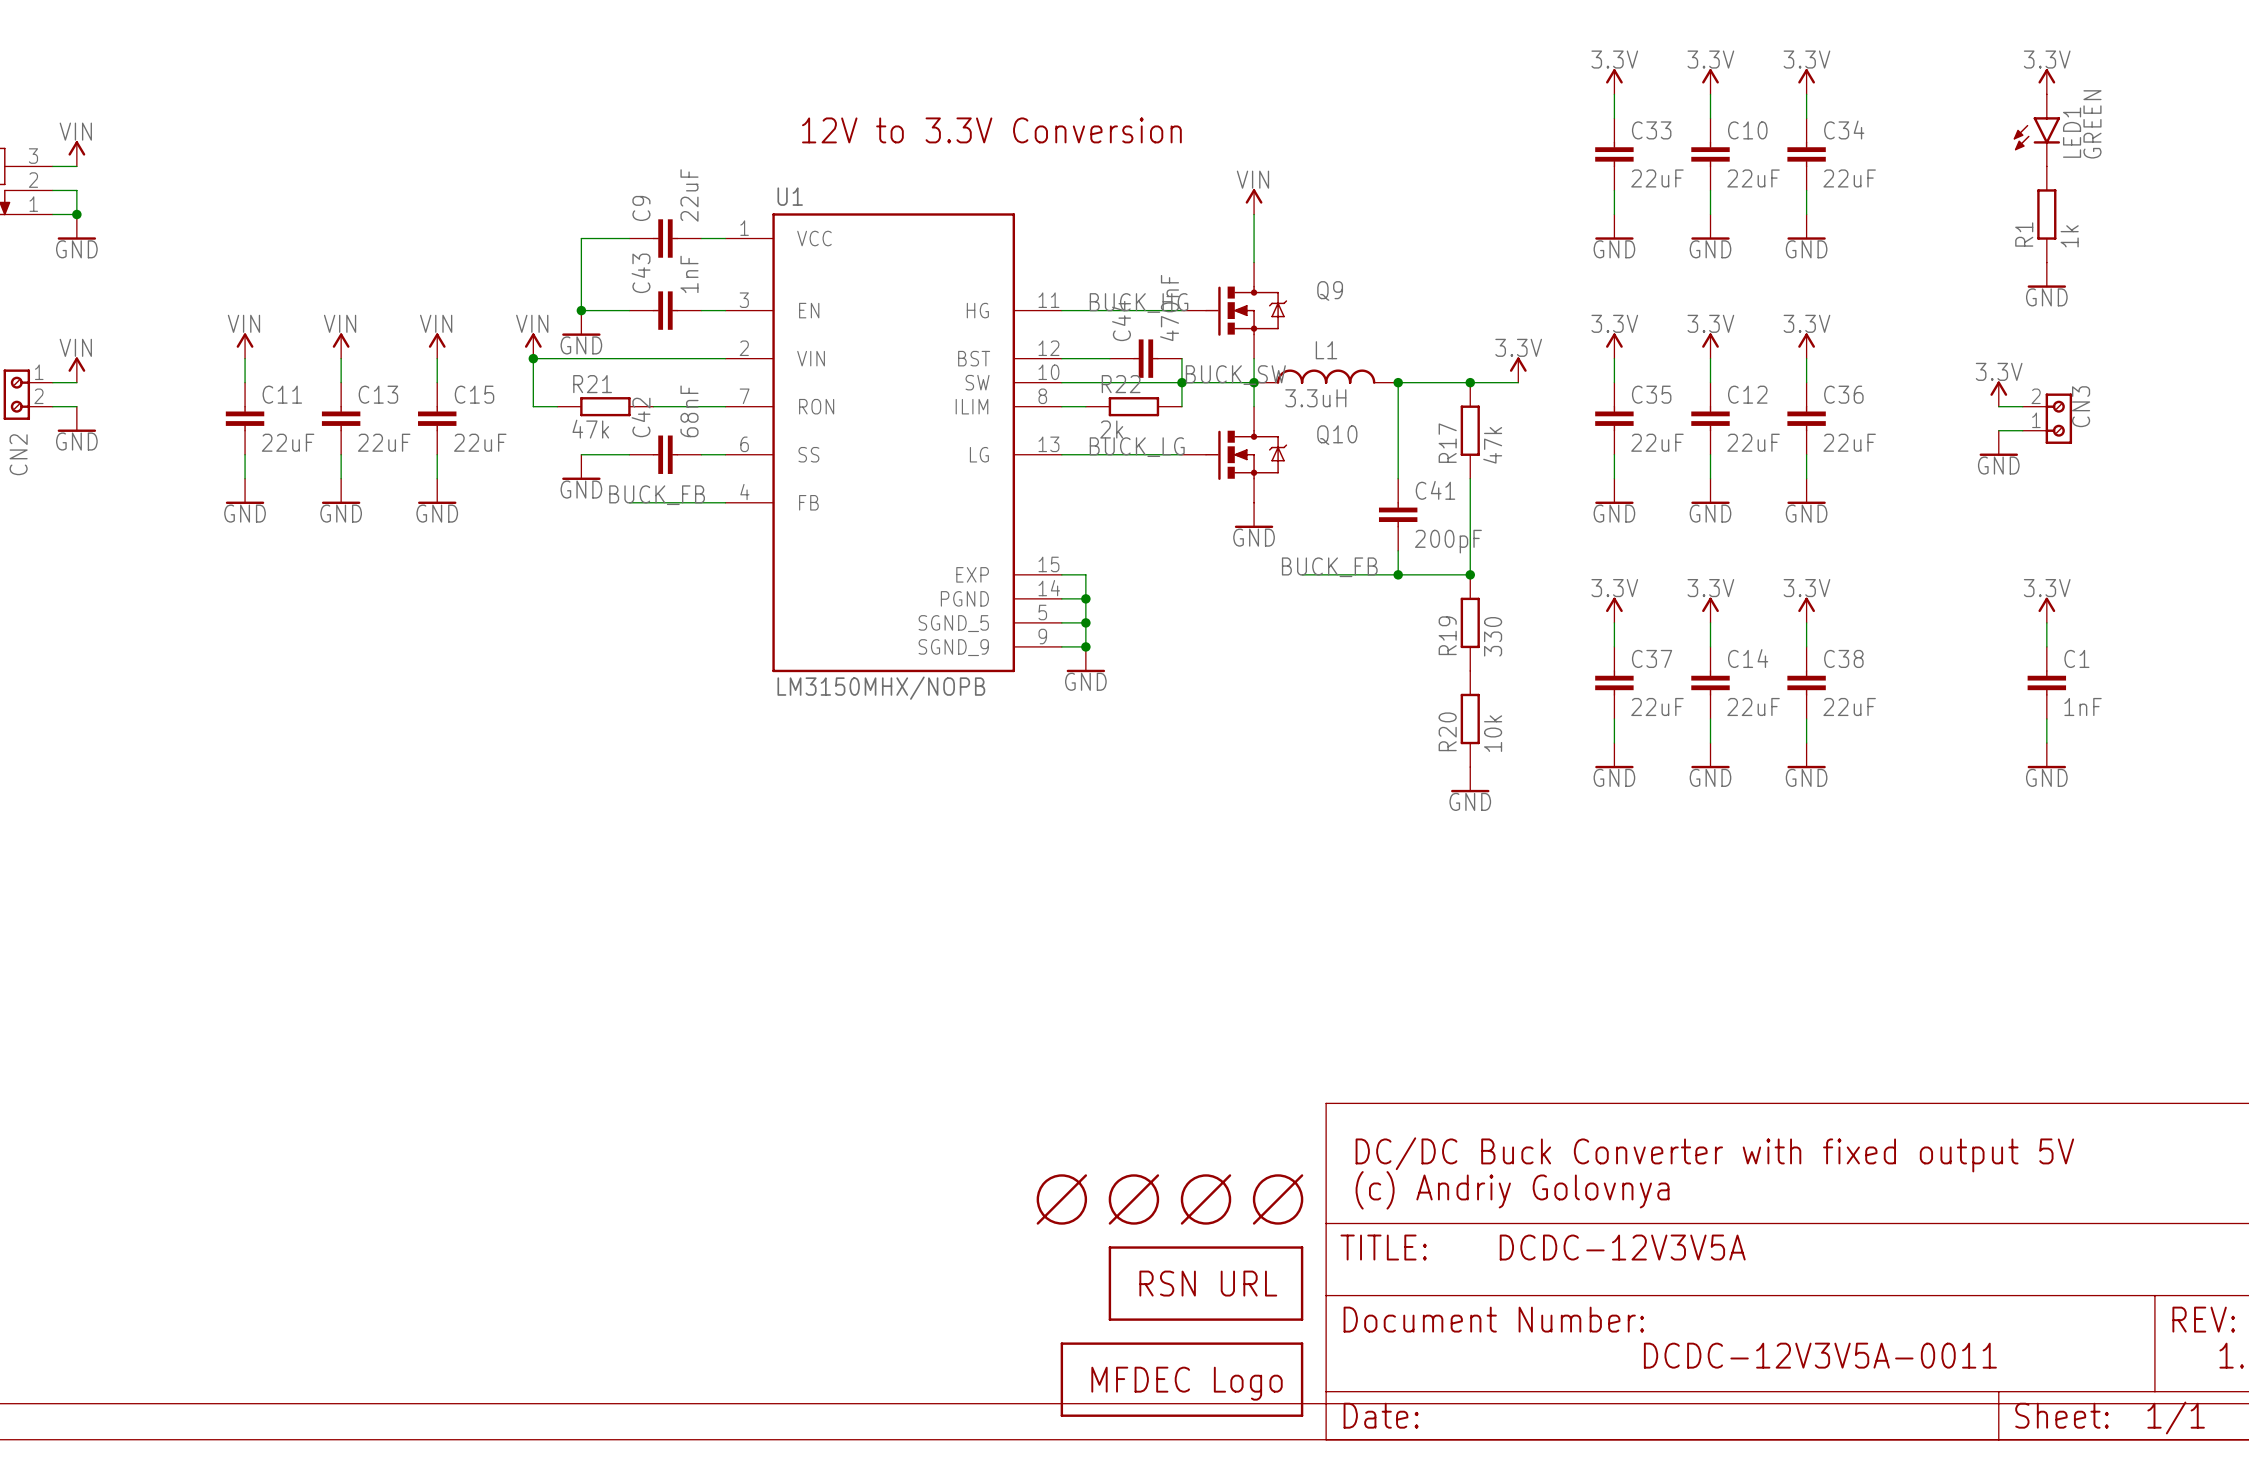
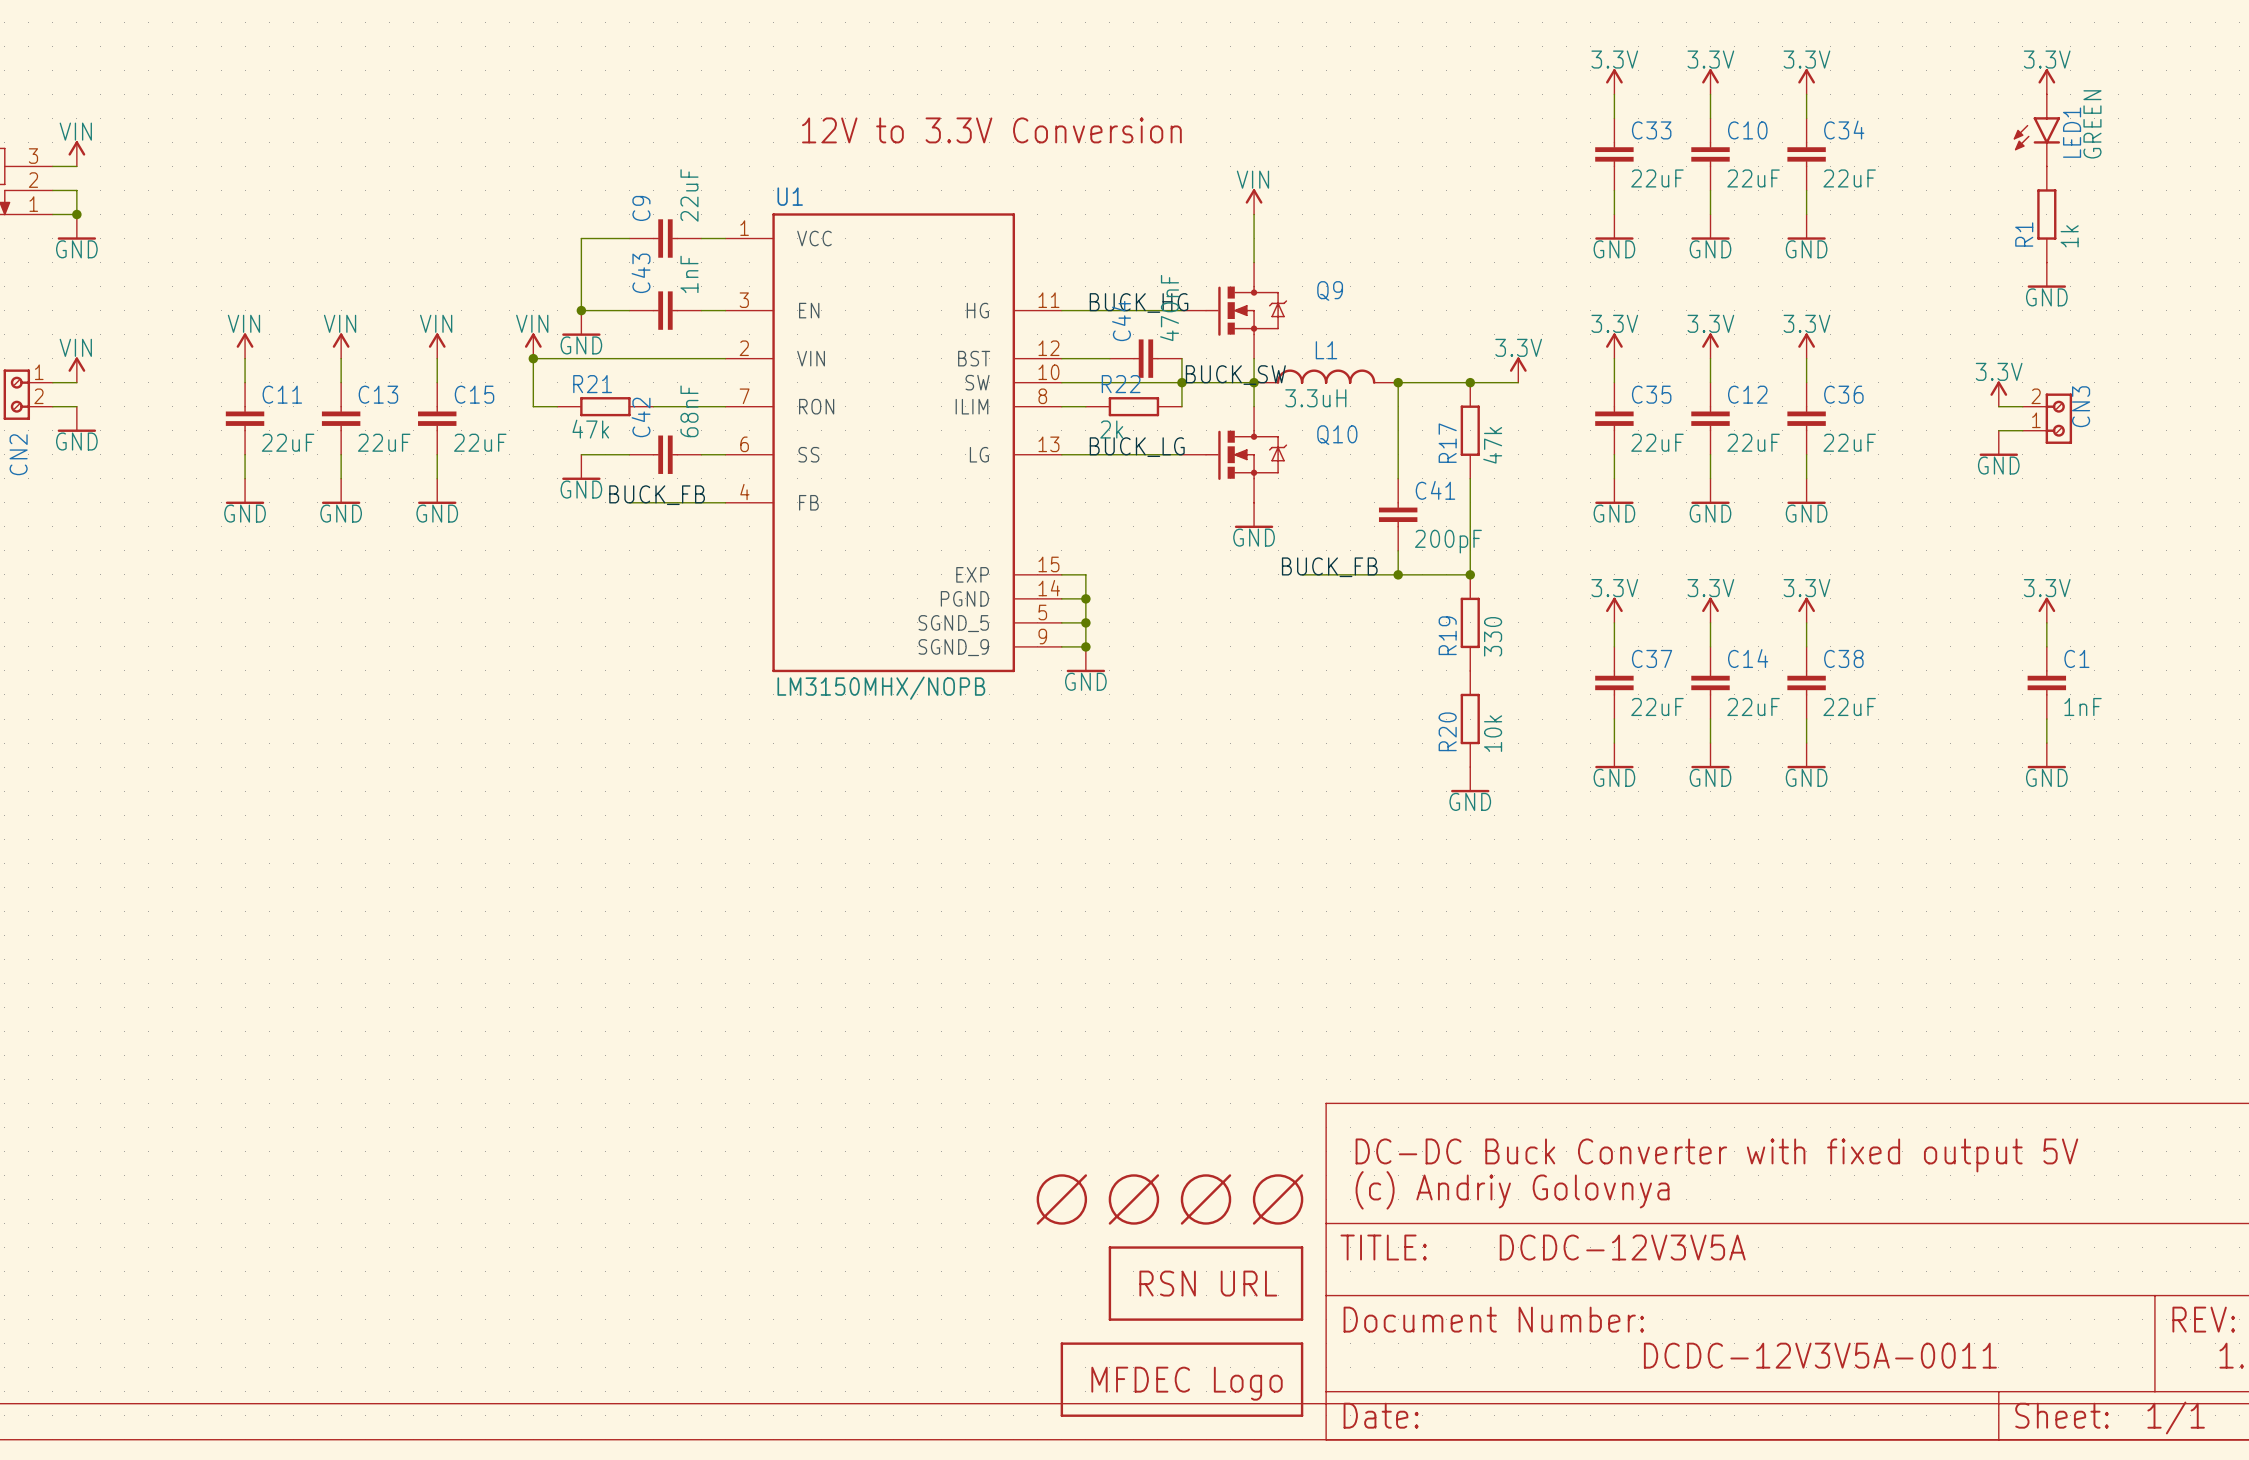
text: DC/DC Buck Converter with fixed output 5V (1714, 1154) -> DC-DC Buck Converter with fixed output 5V (1716, 1155)

